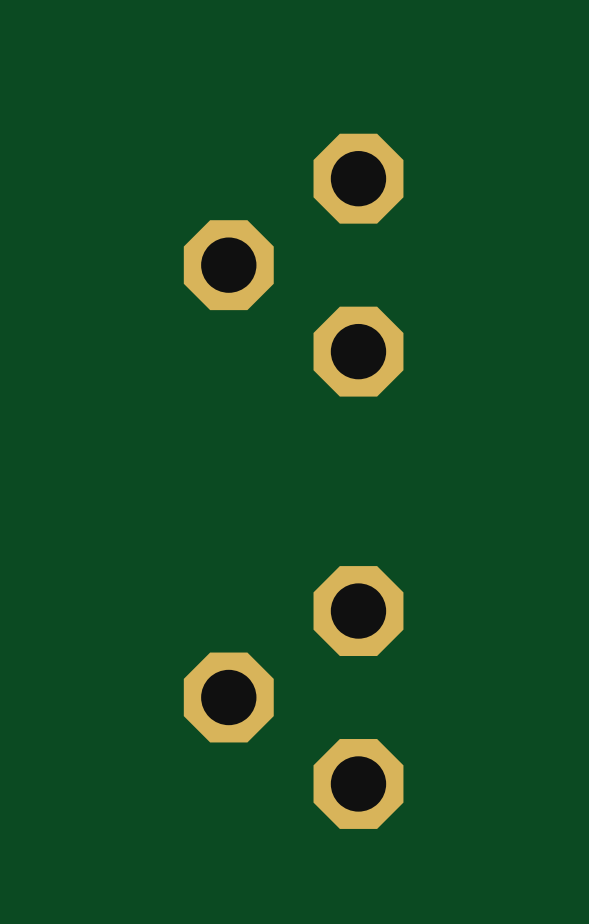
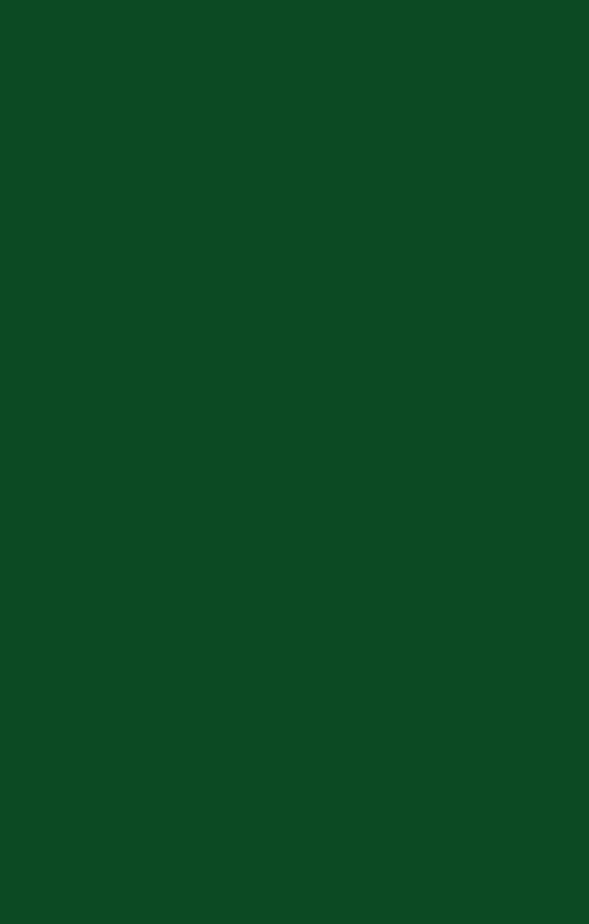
part: (293, 265) -> none
part: (293, 697) -> none

